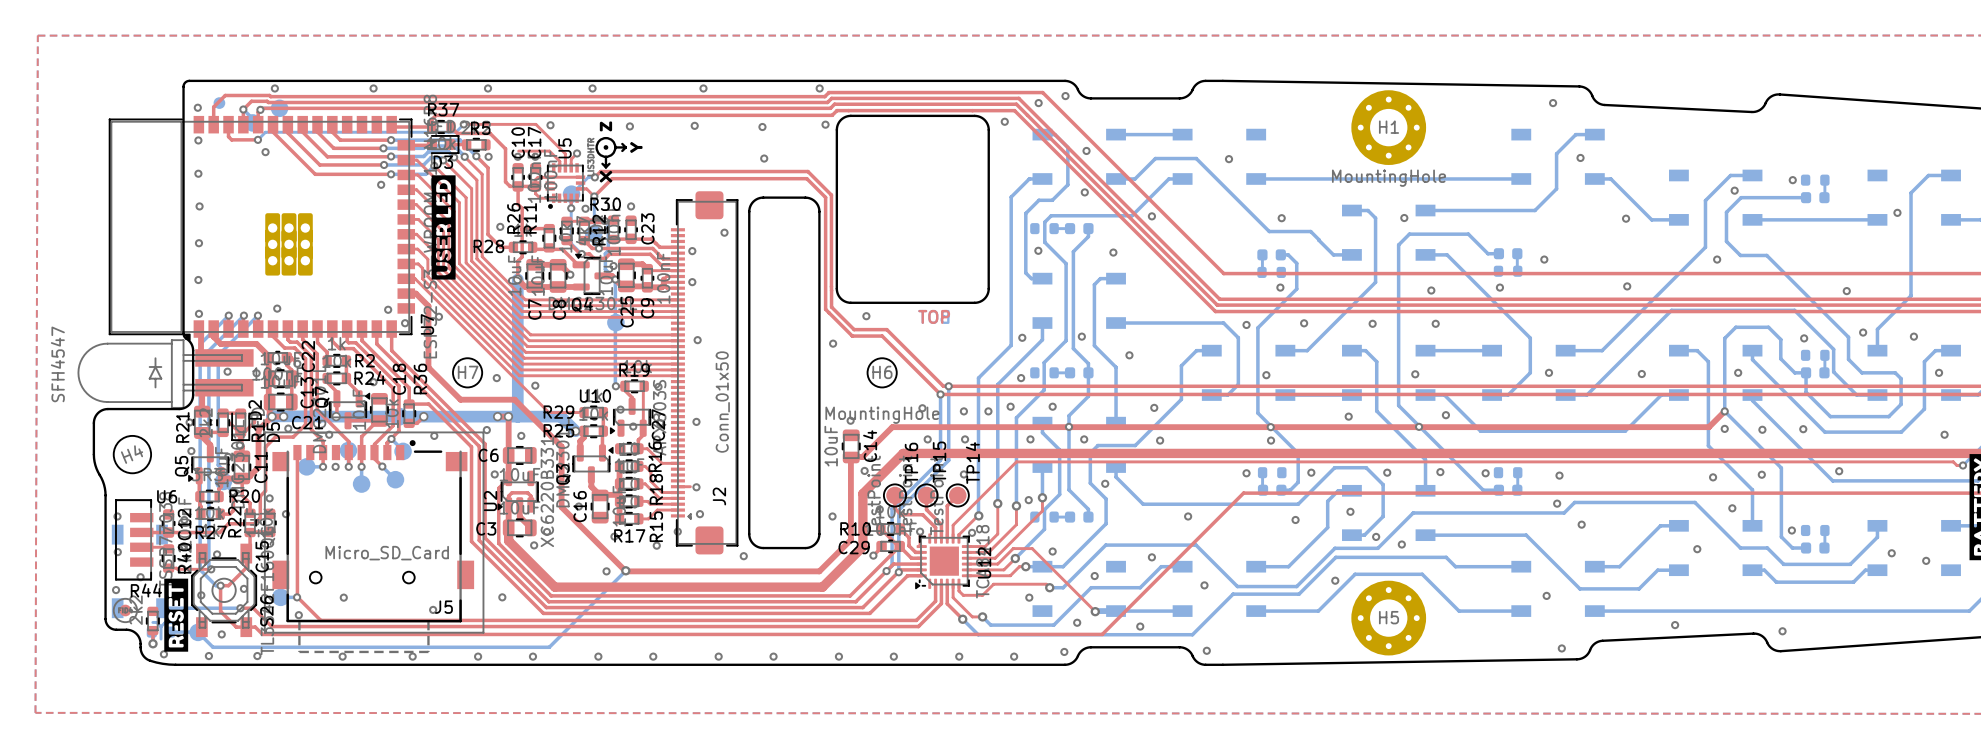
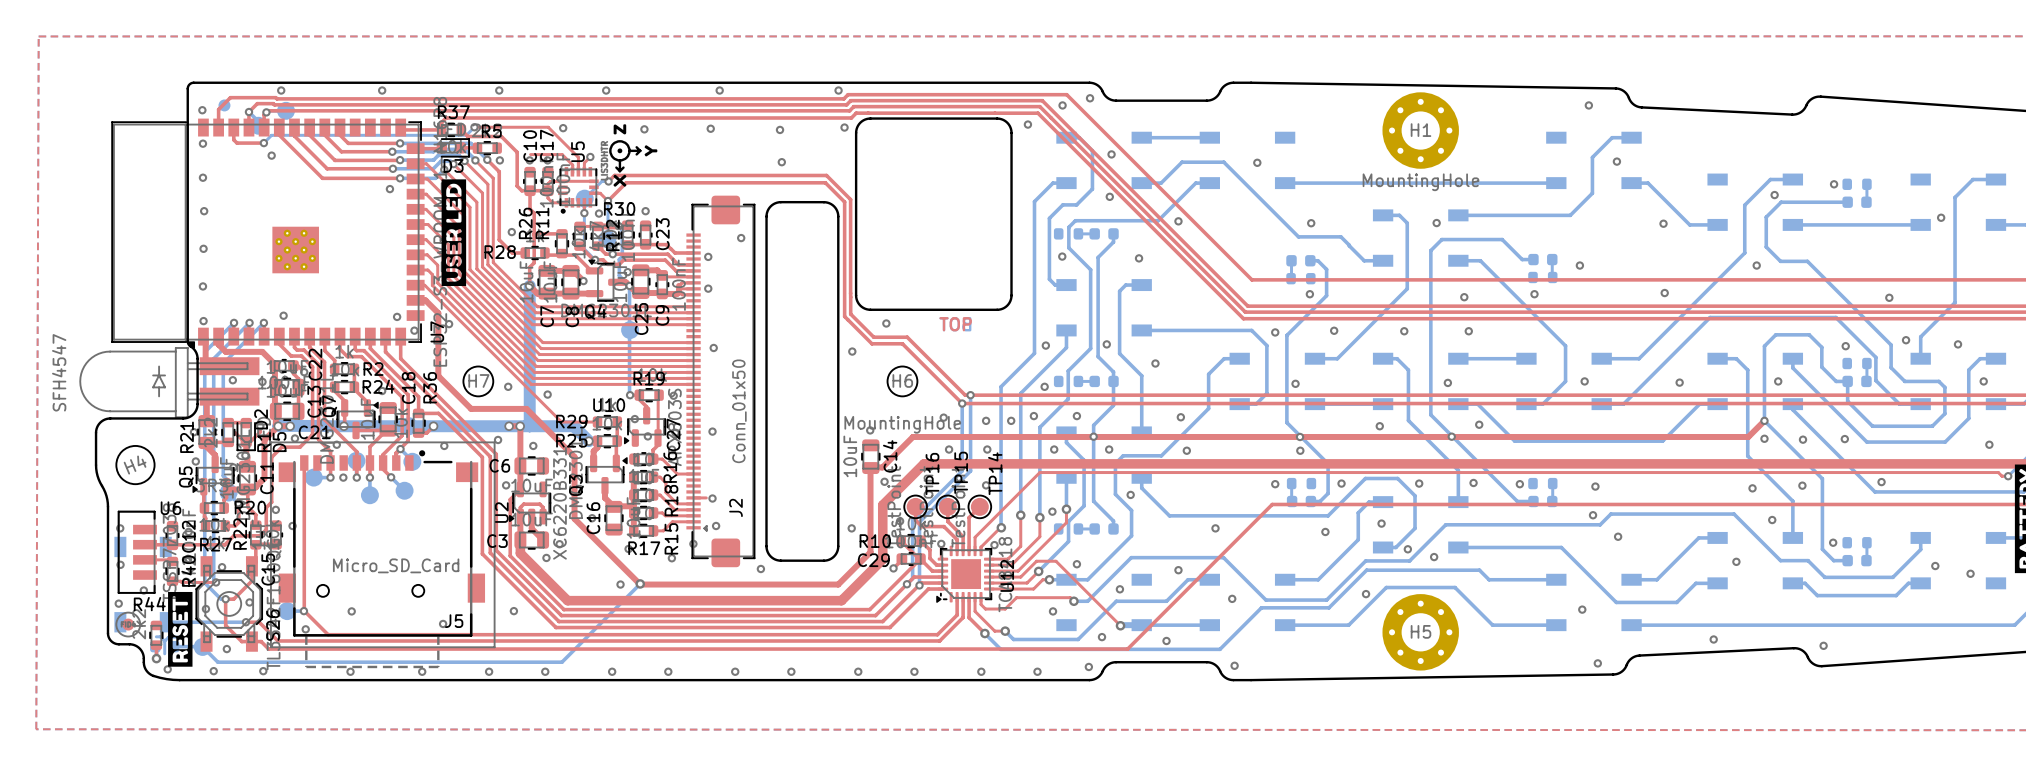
U7 footprint: [108, 115, 416, 341] -> [111, 118, 425, 349]

